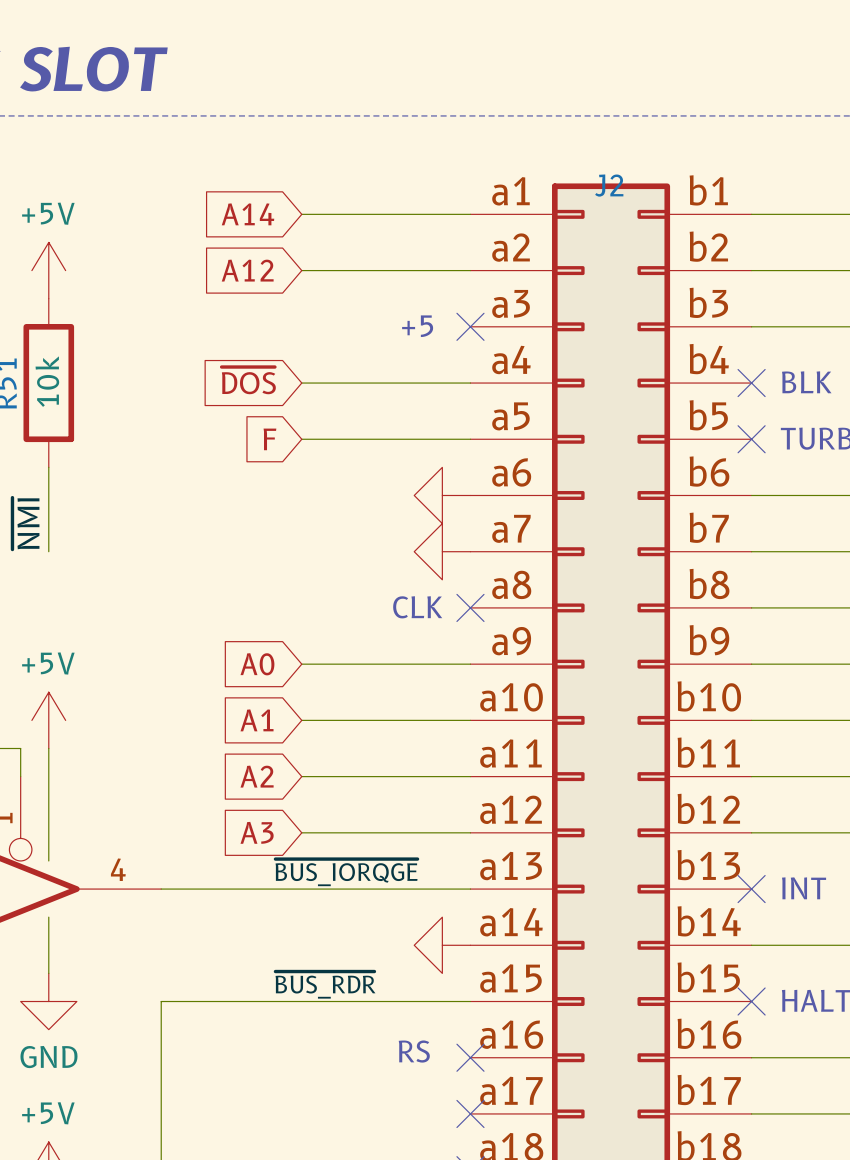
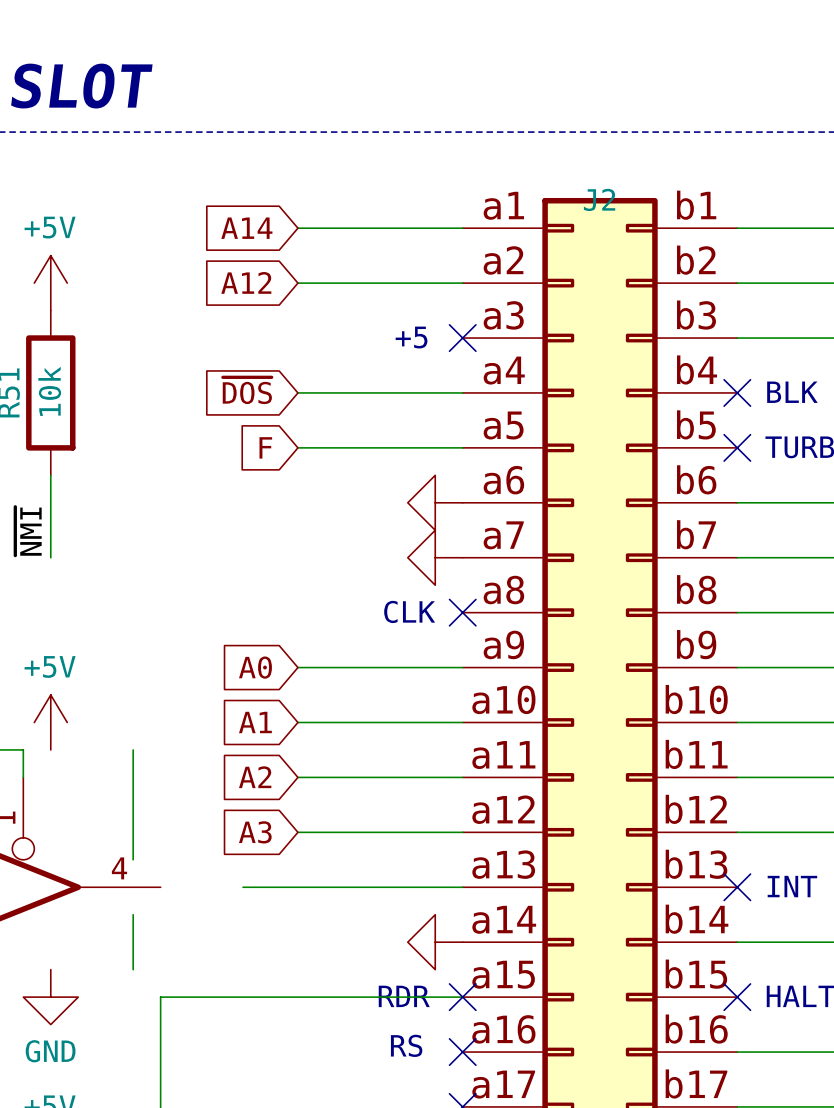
wire: (48, 748) (48, 860) -> (133, 749) (133, 859)
label: ~{BUS_IORQGE} (346, 872) -> none
wire: (161, 889) (245, 889) -> none
wire: (48, 917) (48, 973) -> (133, 914) (133, 969)
label: ~{BUS_RDR} (325, 985) -> none
text: none -> RDR (404, 996)
no-connect mark: none -> (462, 997)

